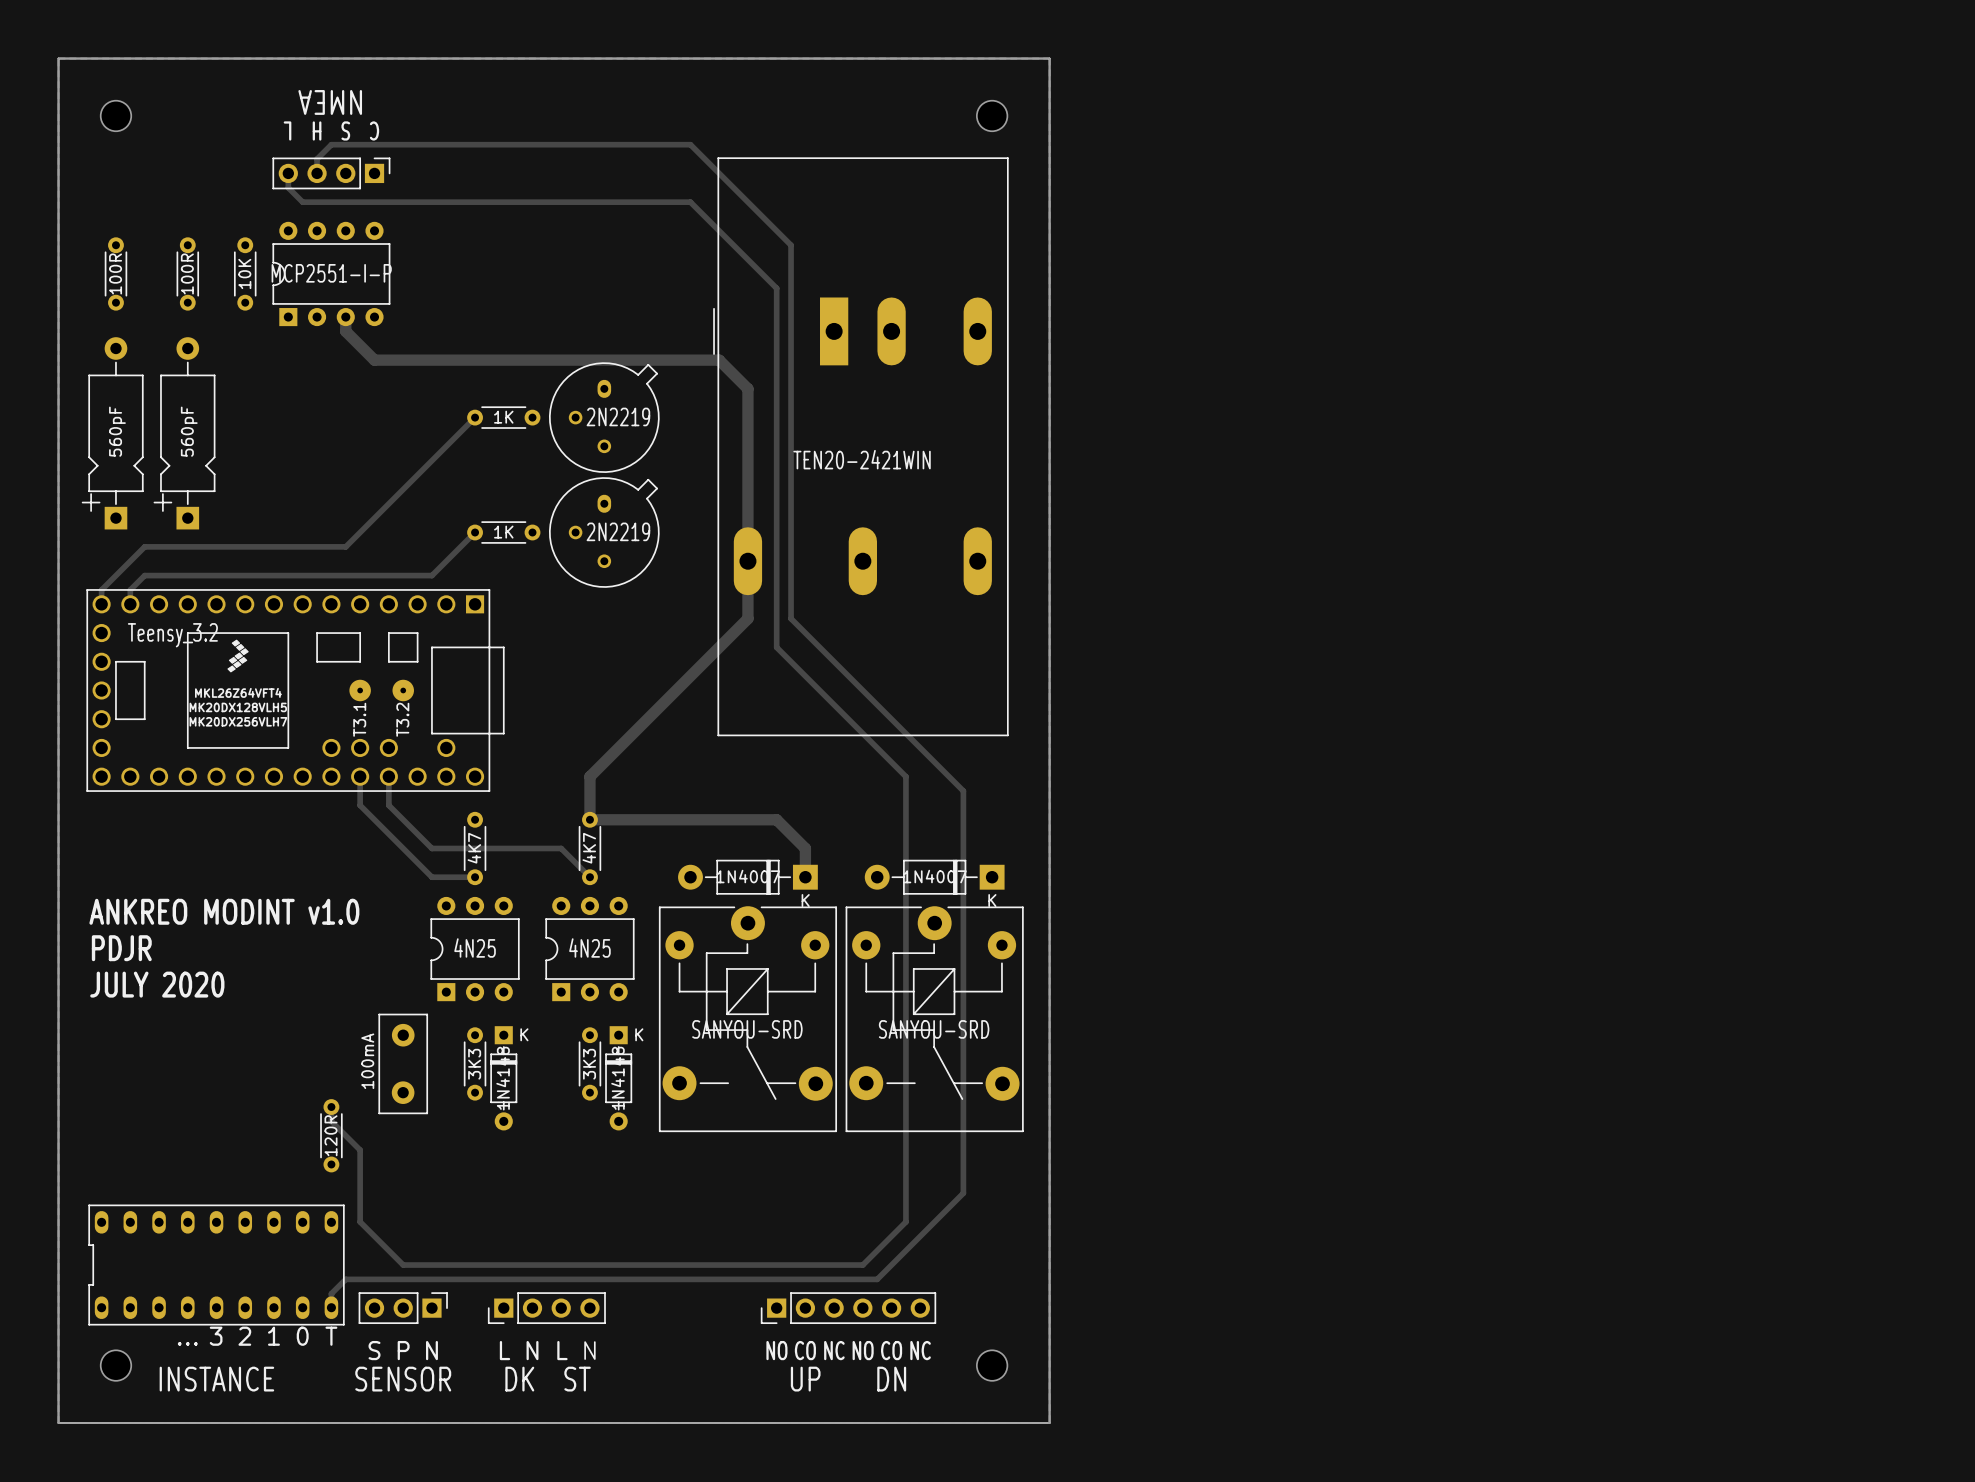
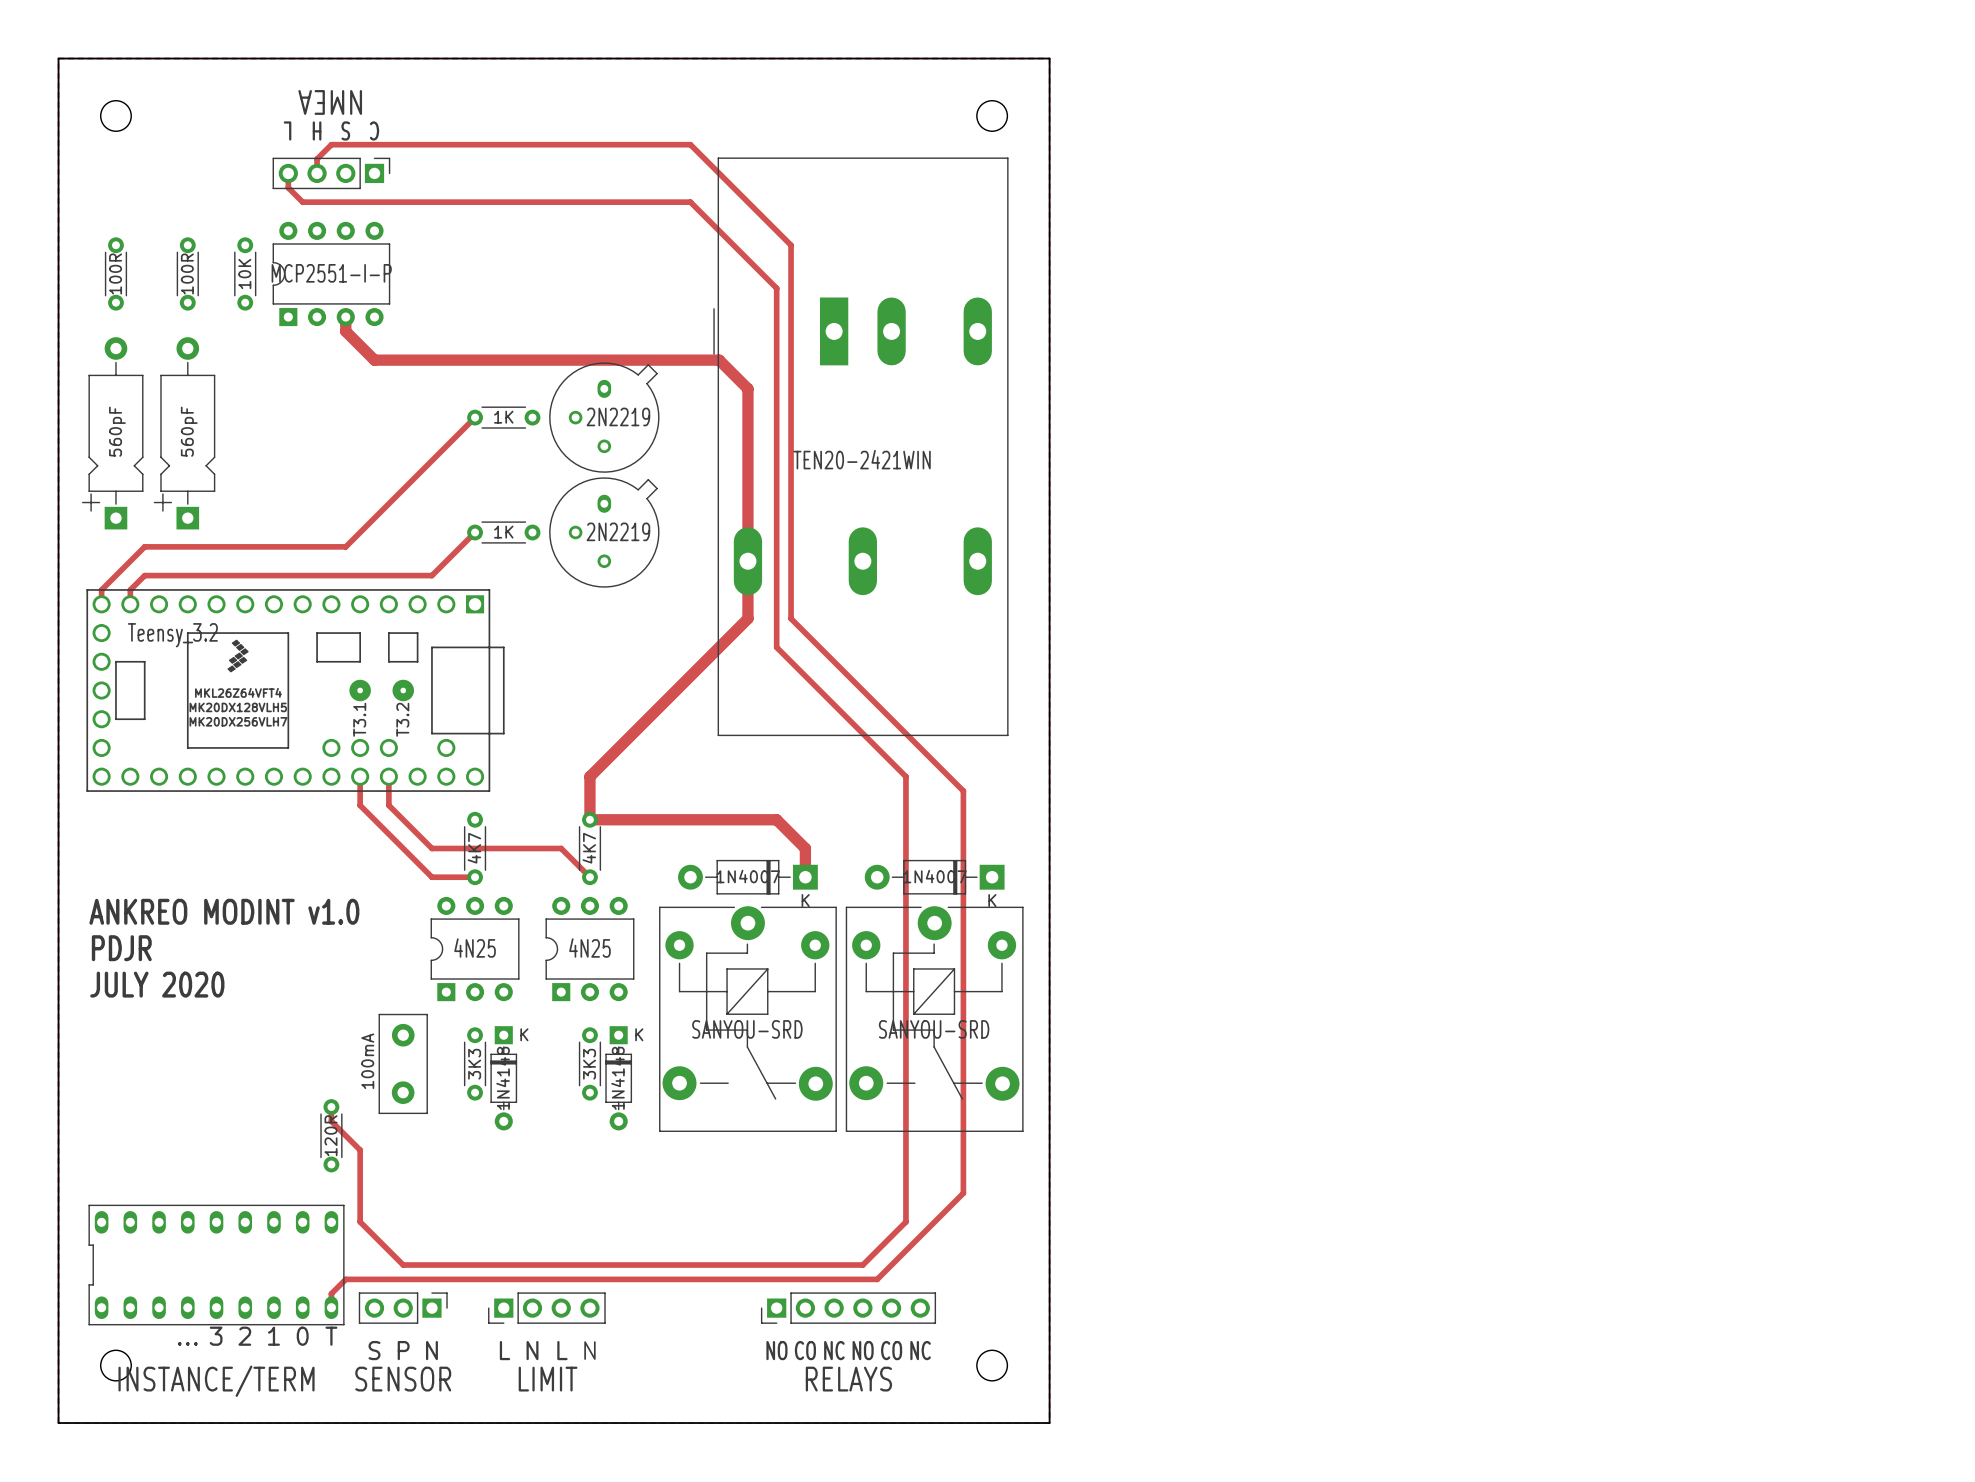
part value: INSTANCE (216, 1379) -> INSTANCE/TERM (216, 1381)
part value: DK ST (548, 1379) -> LIMIT (548, 1379)
part value: UP DN (848, 1379) -> RELAYS (848, 1379)

